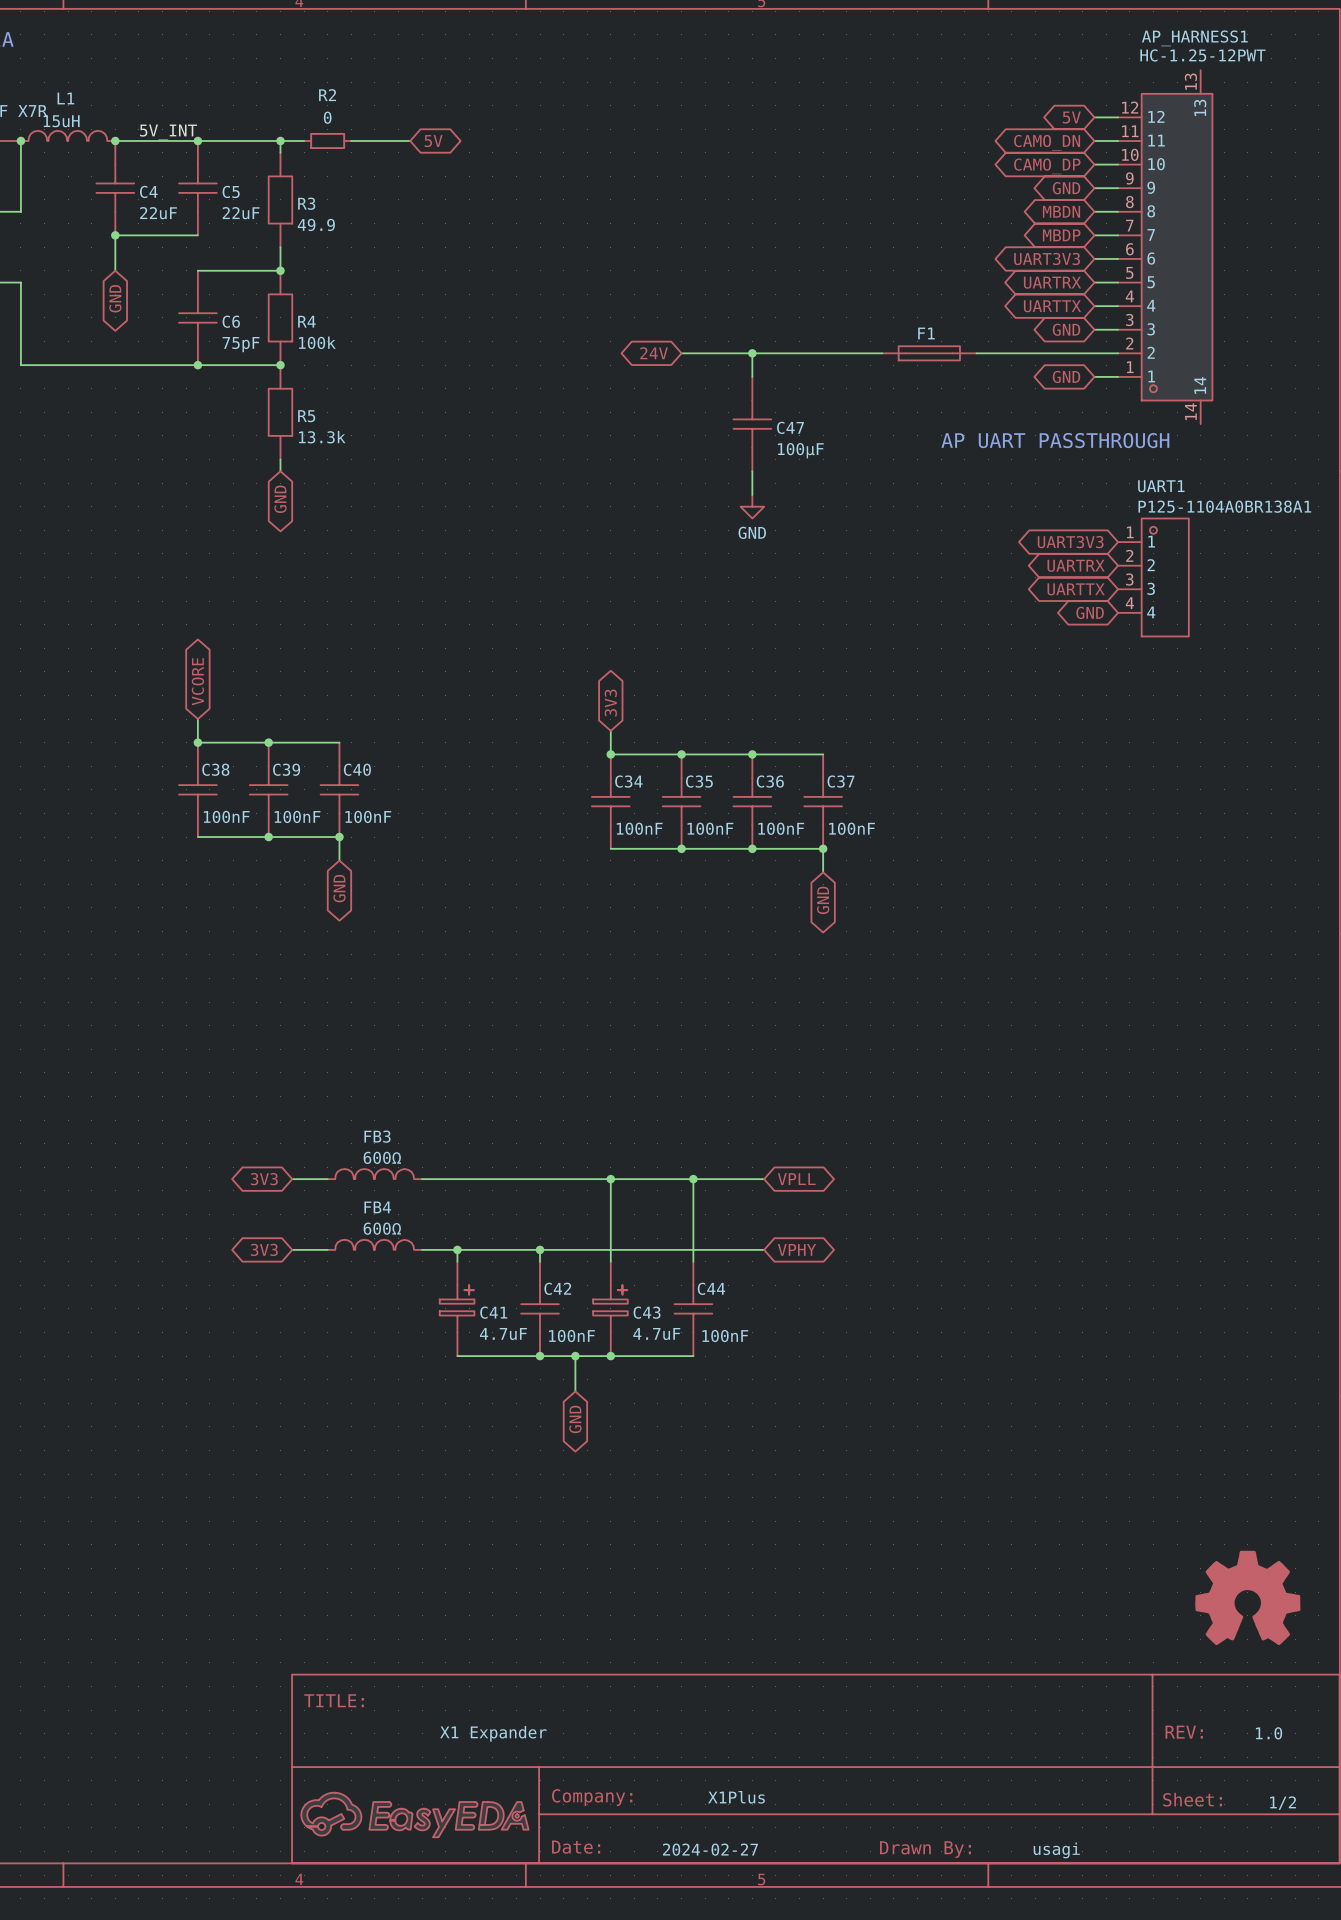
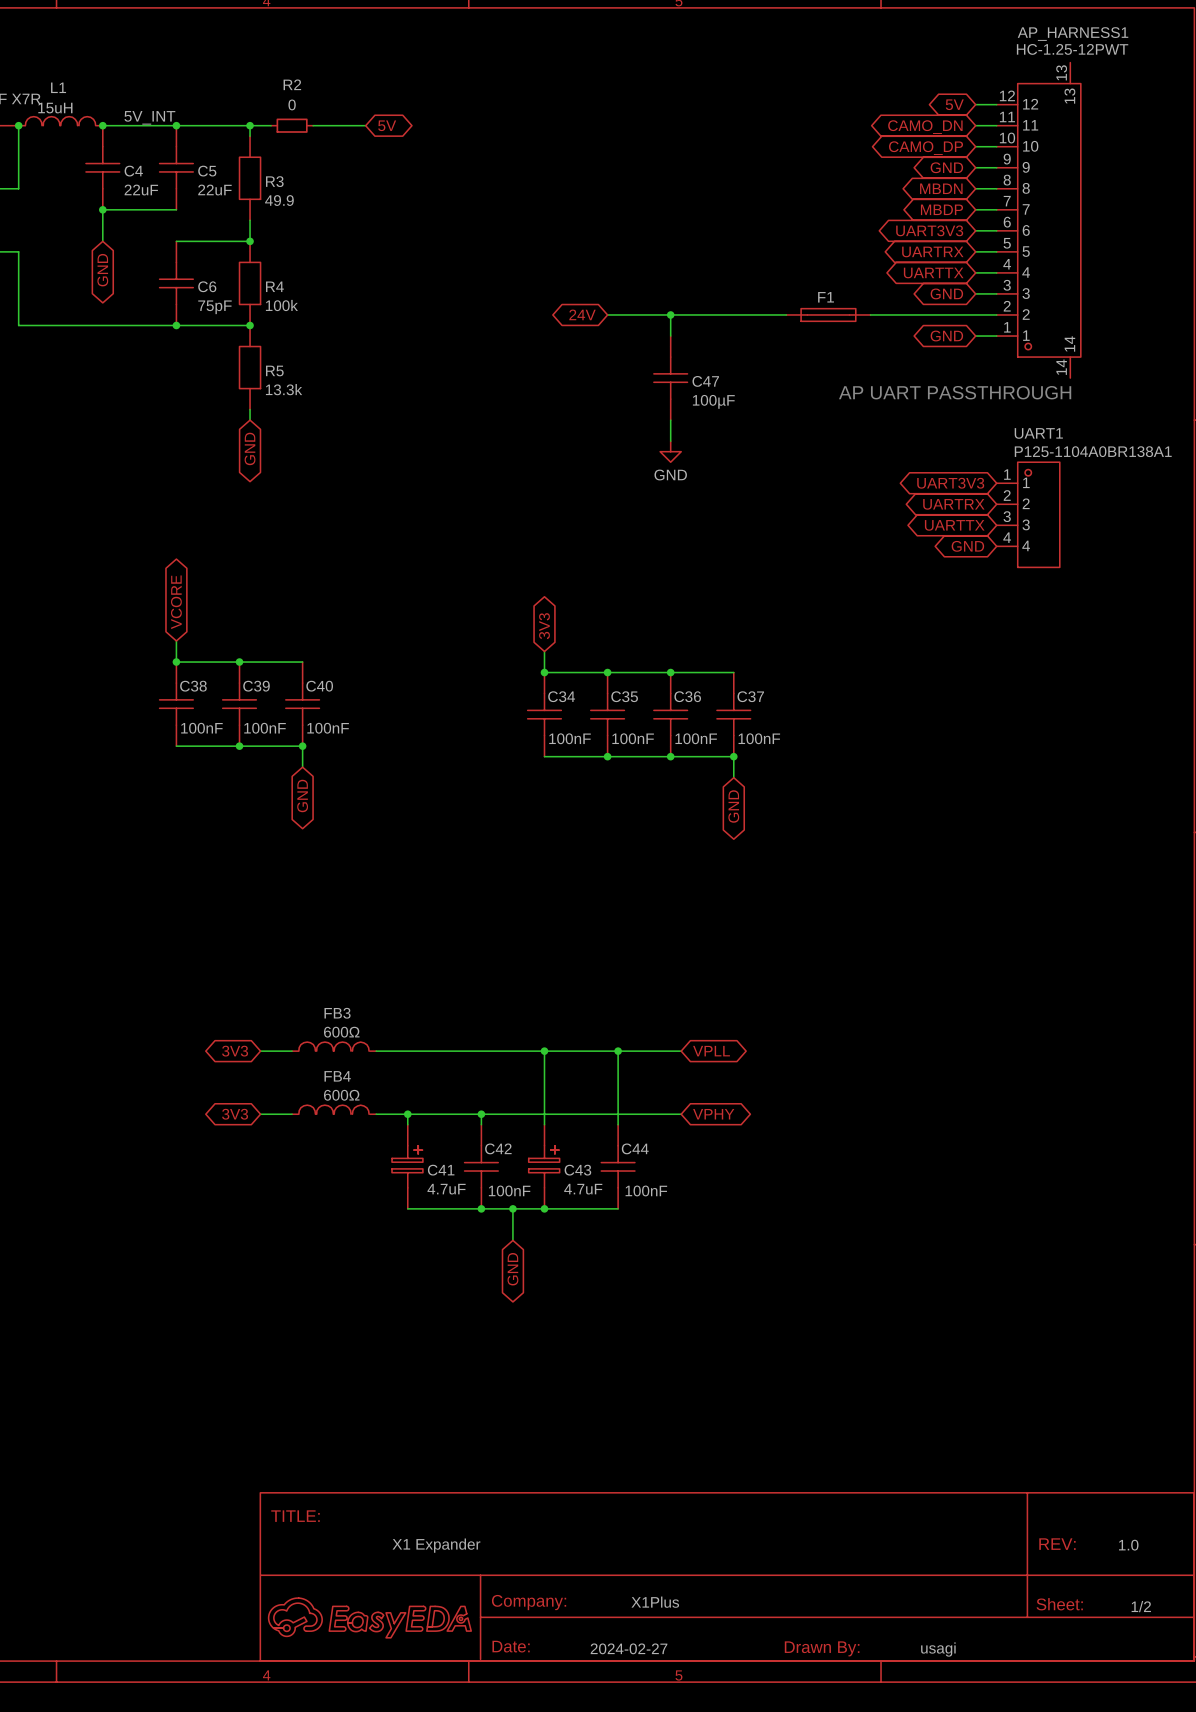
power symbol: (1247, 1597) -> none

